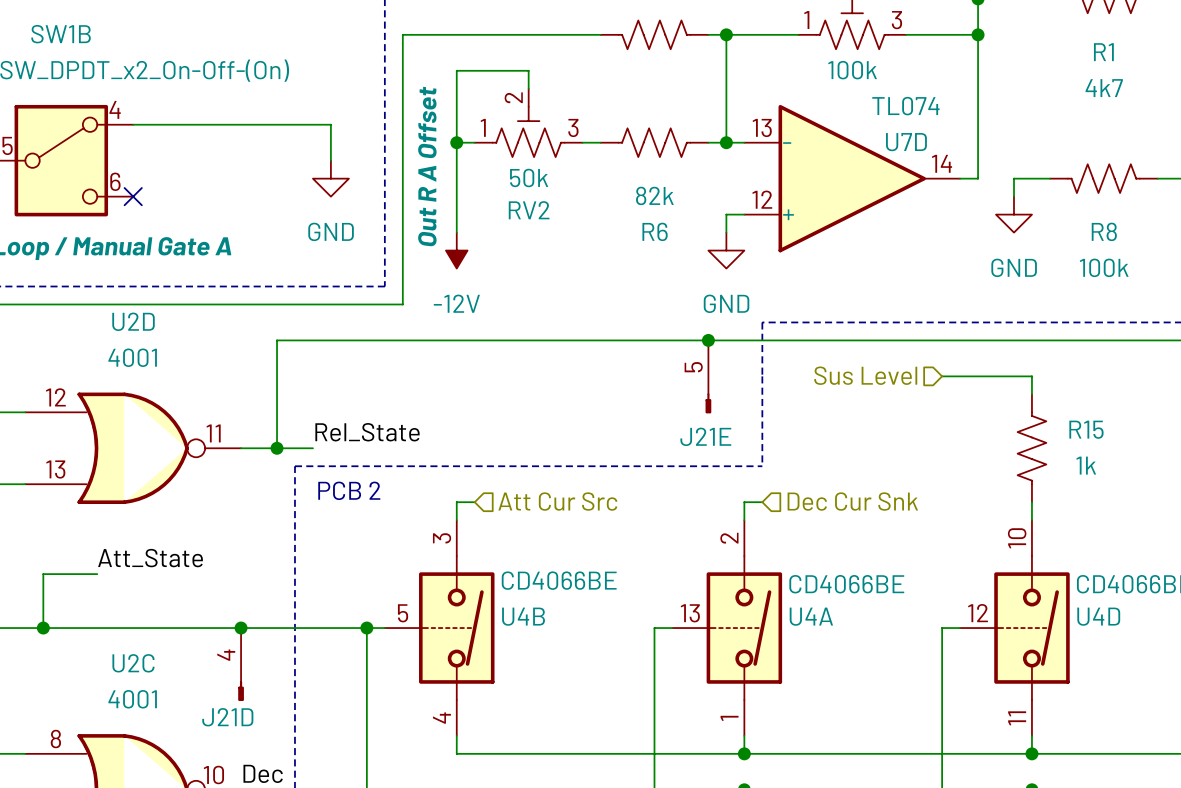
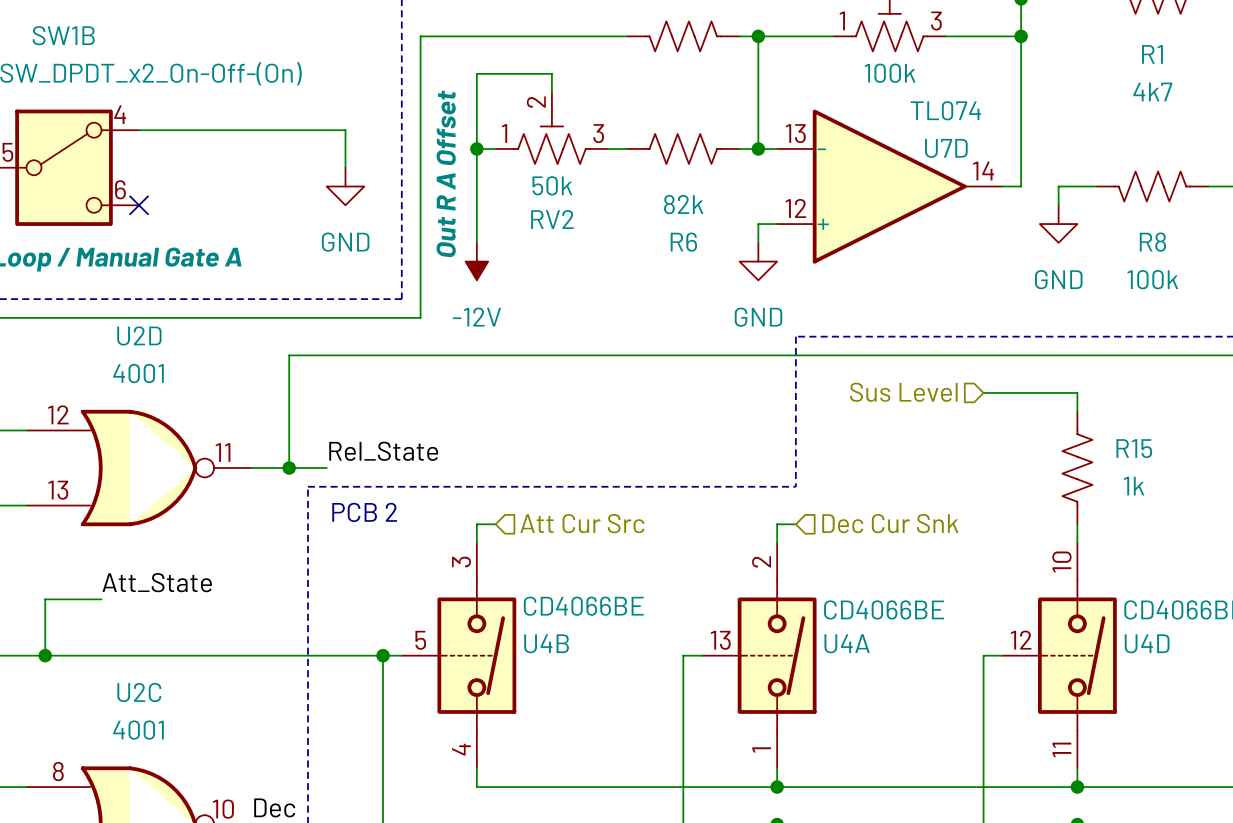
junction: (708, 340) -> none
J21E: (708, 376) -> none
junction: (241, 628) -> none
J21D: (241, 664) -> none

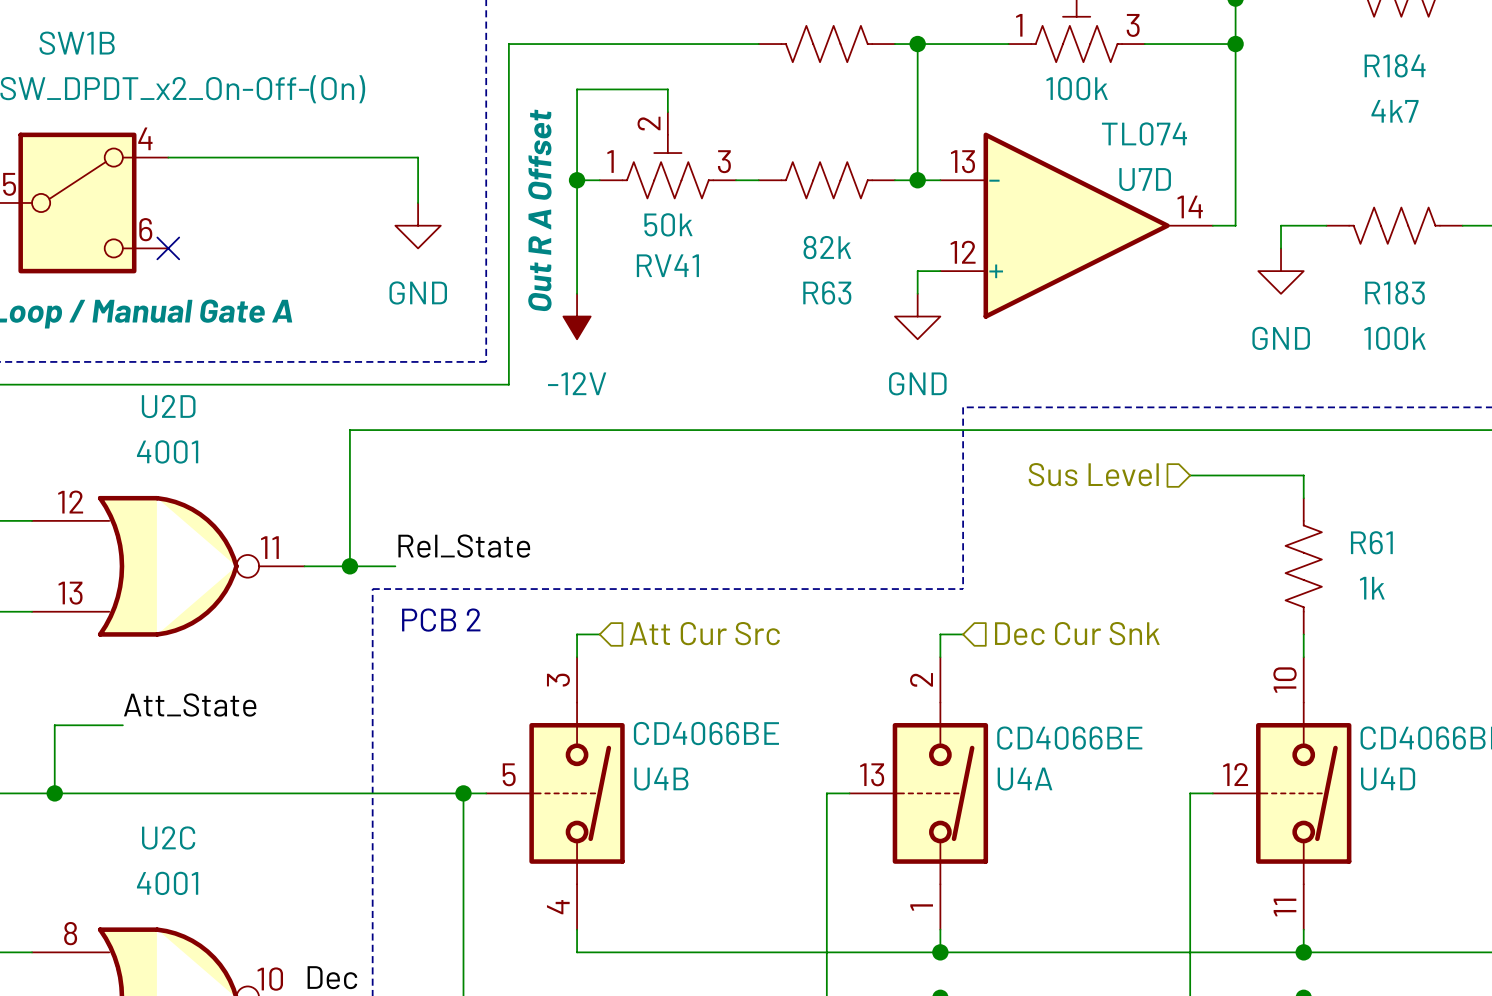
R1 name: R1 (1152, 54) -> R184 (1395, 65)
RV2 name: RV2 (552, 219) -> RV41 (667, 265)
R6 name: R6 (683, 242) -> R63 (827, 292)
R8 name: R8 (1152, 242) -> R183 (1395, 292)
R15 name: R15 (1134, 448) -> R61 (1371, 542)

